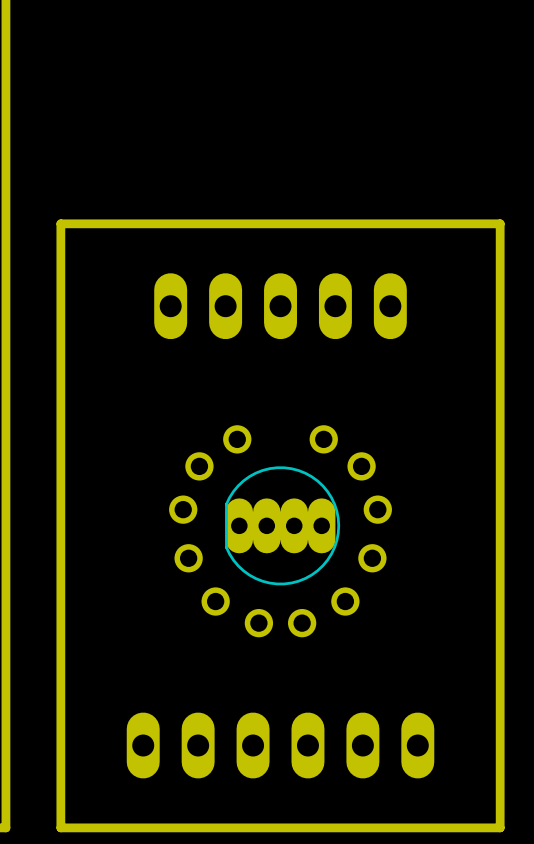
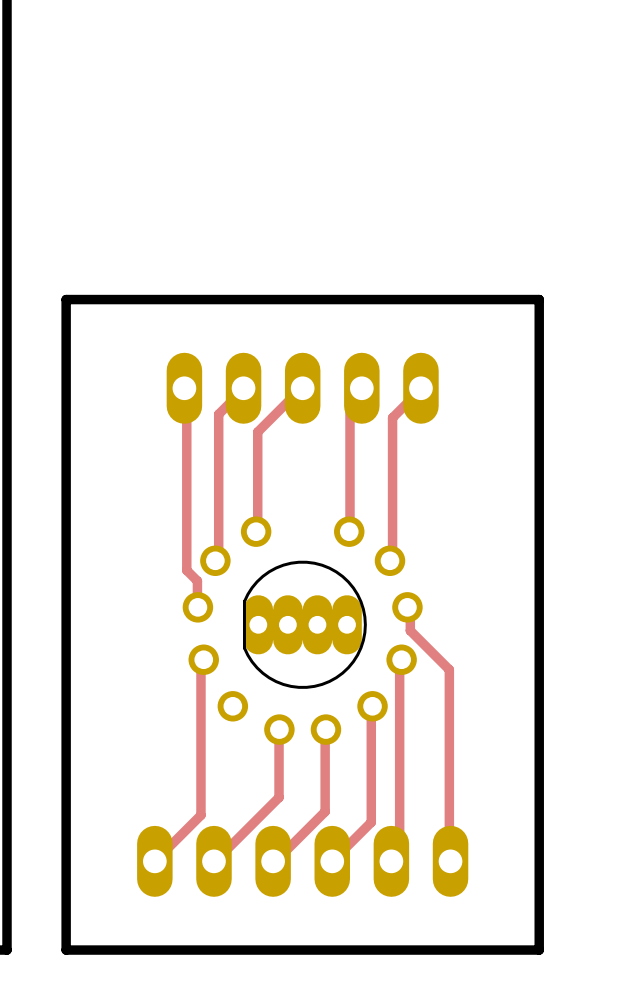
top track: none -> (184, 388) (186, 389) (186, 570) (197, 581) (197, 607)
top track: none -> (243, 388) (218, 414) (218, 559) (215, 560)
top track: none -> (302, 388) (257, 432) (257, 531) (256, 531)
top track: none -> (361, 388) (349, 400) (349, 531)
top track: none -> (420, 388) (392, 417) (392, 559) (389, 560)
top track: none -> (407, 607) (410, 609) (410, 630) (449, 669) (450, 861)
top track: none -> (203, 659) (200, 662) (200, 815) (154, 861)
top track: none -> (401, 659) (399, 662) (399, 854) (391, 861)
top track: none -> (372, 706) (371, 822) (332, 861)
top track: none -> (279, 729) (279, 797) (213, 861)
top track: none -> (325, 729) (325, 811) (275, 861) (273, 861)

